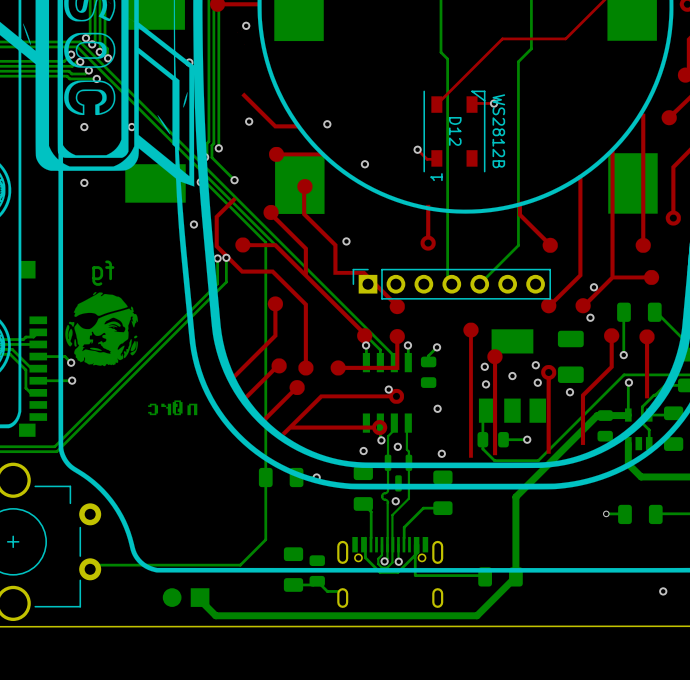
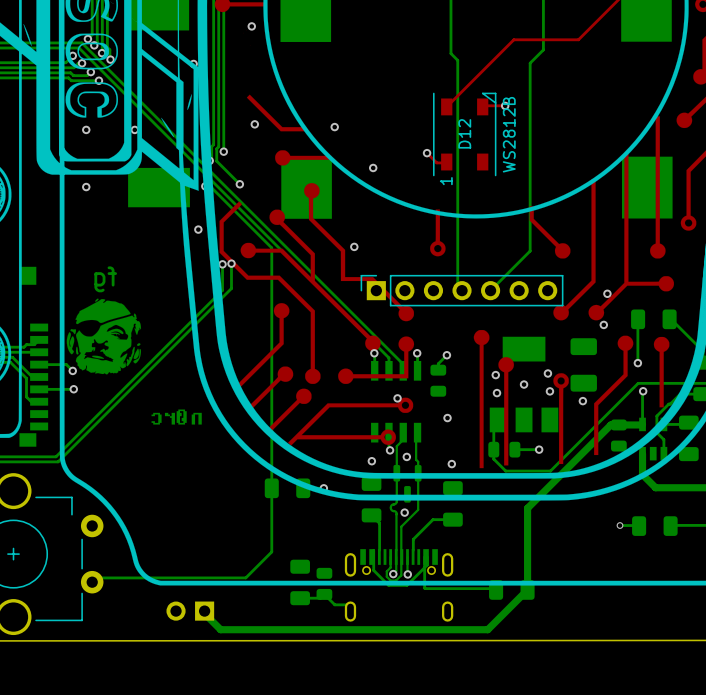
D12 name rotation: 0° (455, 131) -> 180° (464, 133)
D12 value rotation: 0° (498, 131) -> 180° (509, 134)
part footprint: [162, 588, 210, 607] -> [166, 601, 215, 621]
via: (663, 591) -> none

